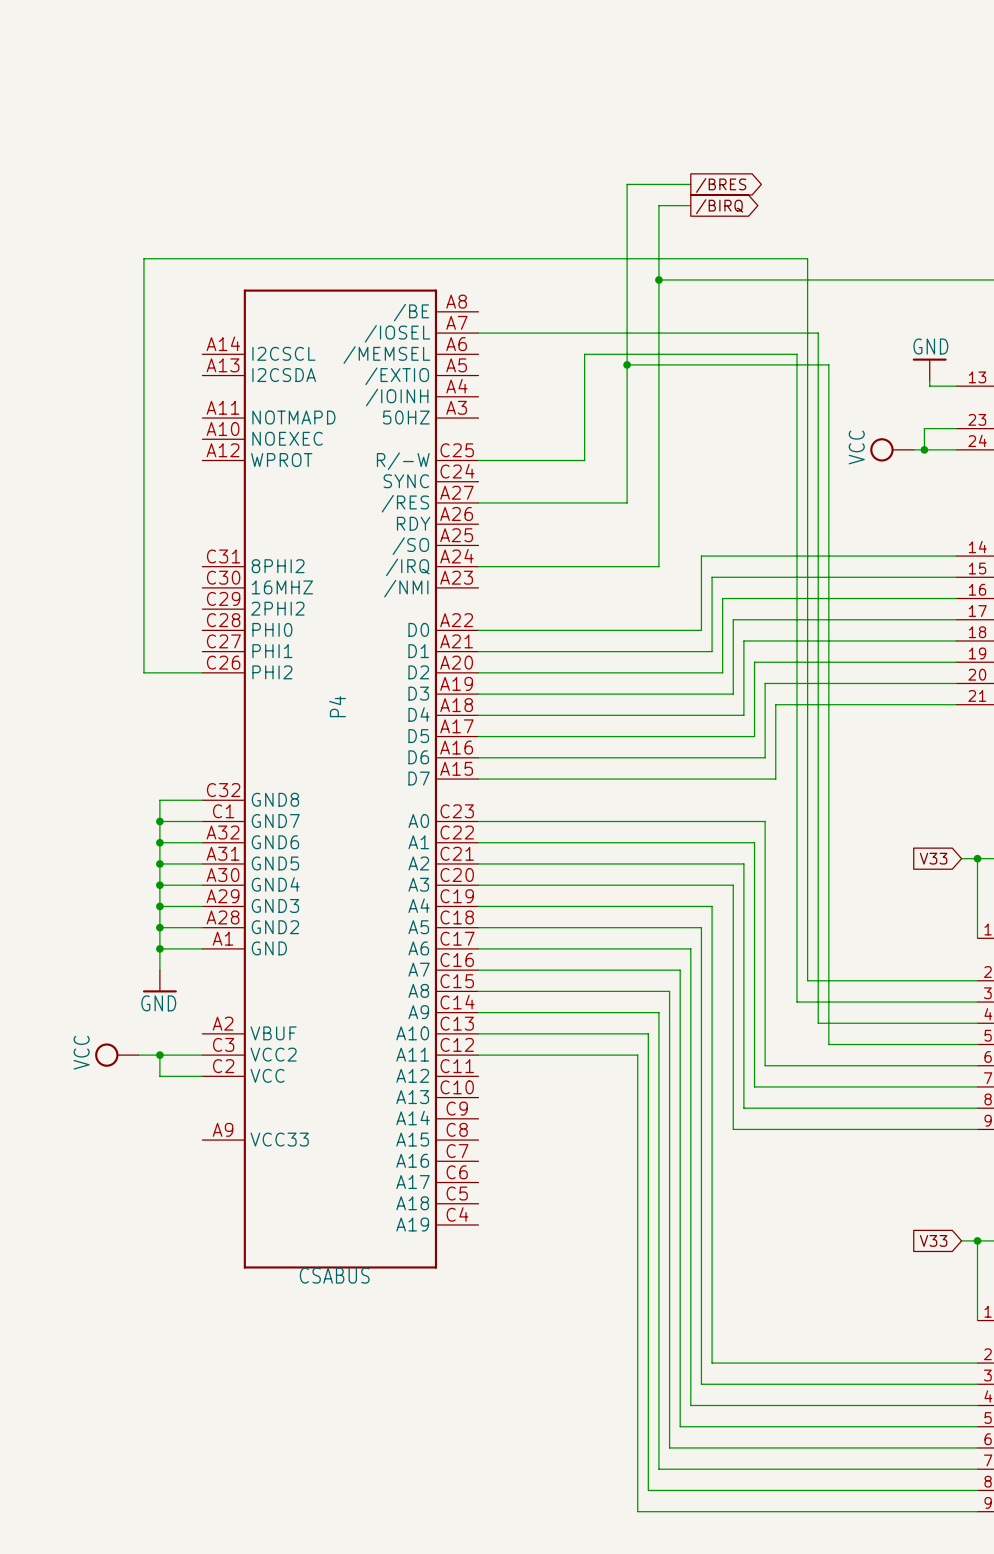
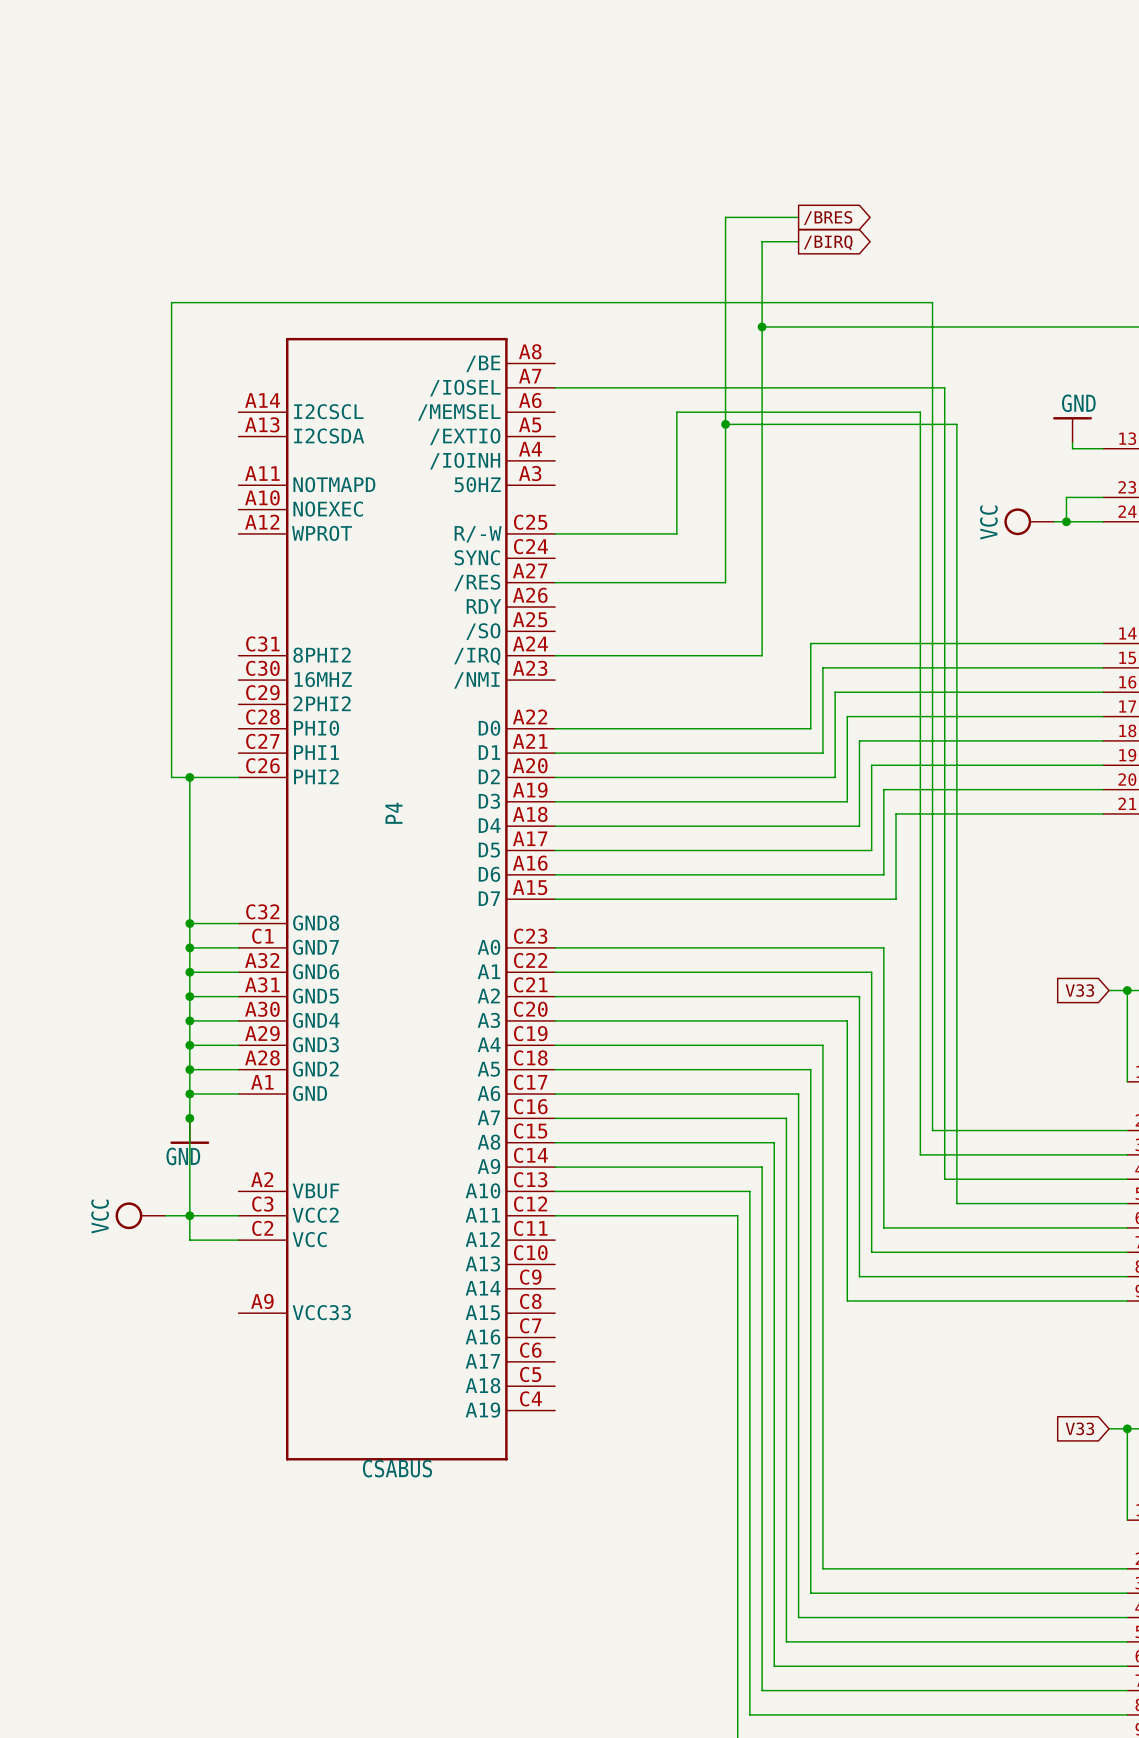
wire: none -> (189, 777) (189, 923)
junction: none -> (189, 777)
junction: none -> (189, 923)
wire: none -> (189, 1118) (189, 1215)
junction: none -> (189, 1118)

